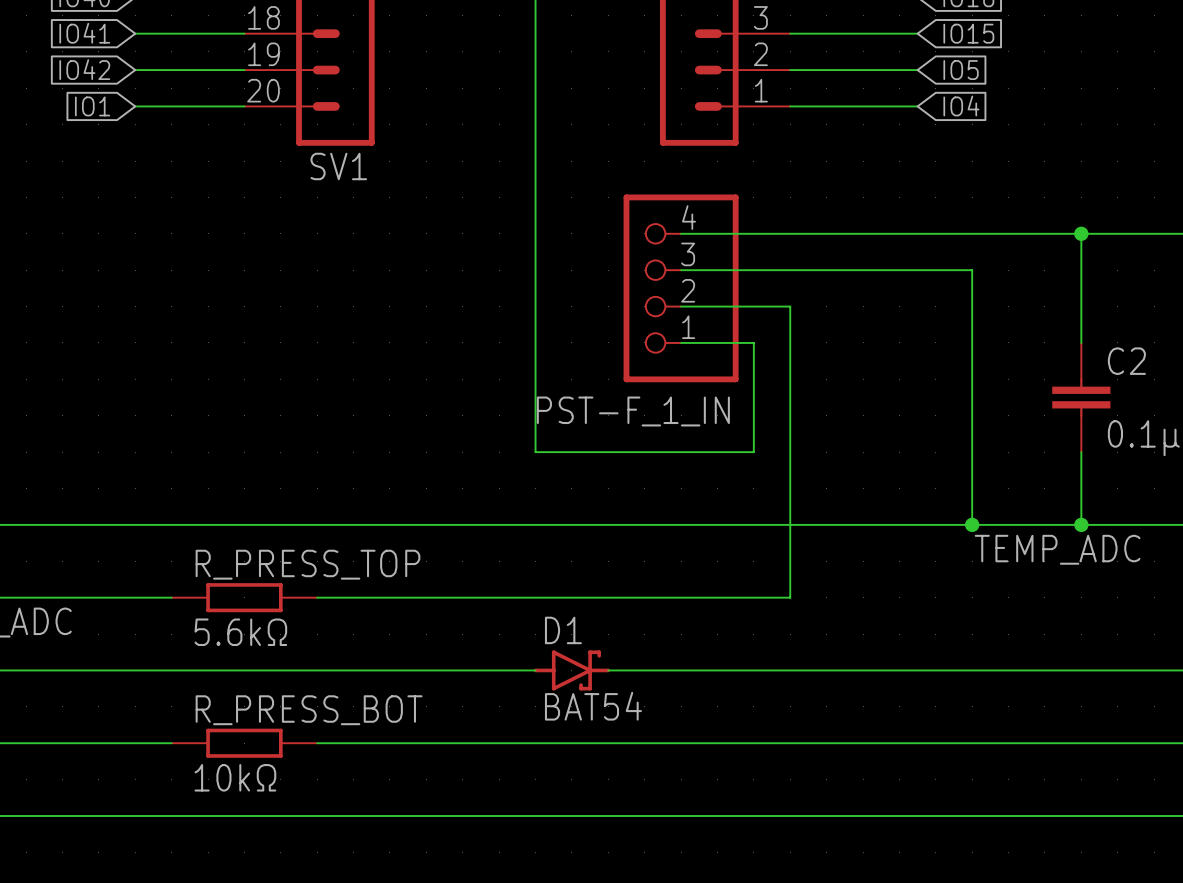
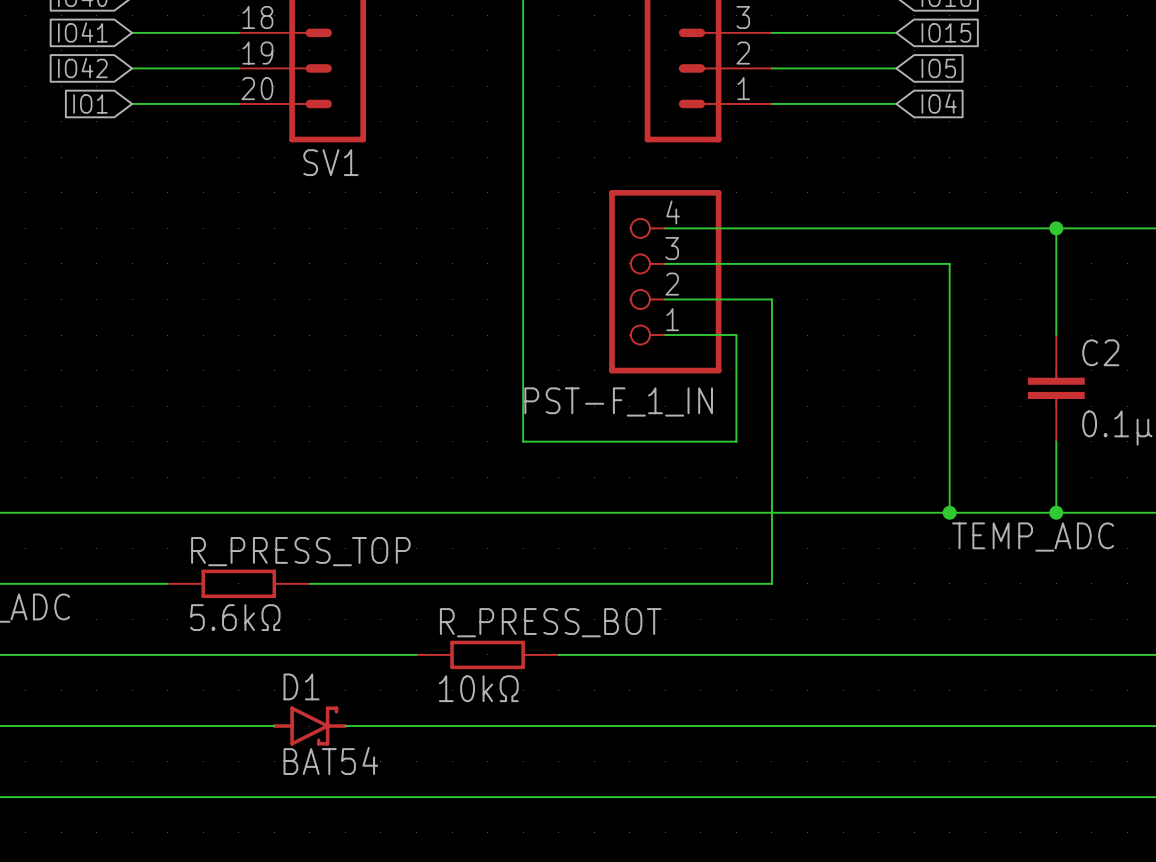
wire: (426, 670) (535, 670) -> (167, 726) (274, 726)
D1 position: (571, 670) -> (309, 726)
R_PRESS_BOT position: (244, 743) -> (487, 654)

